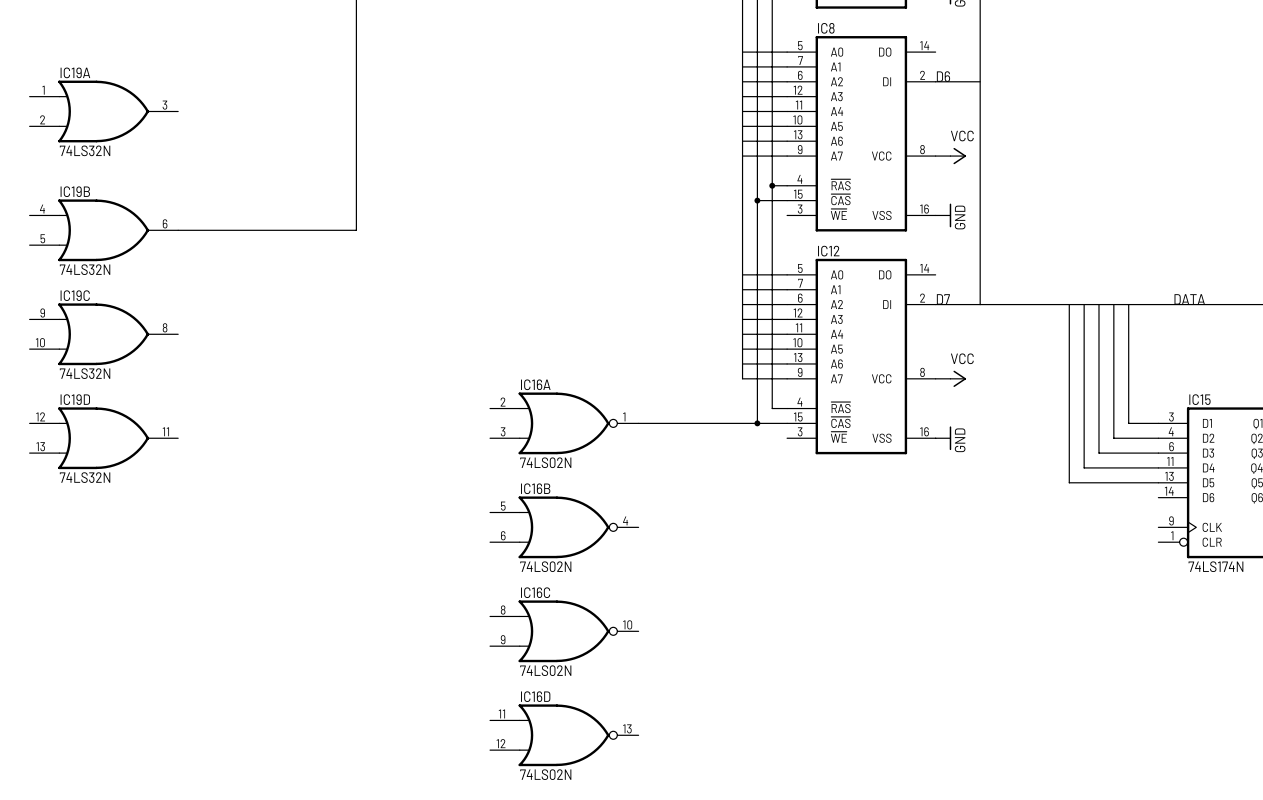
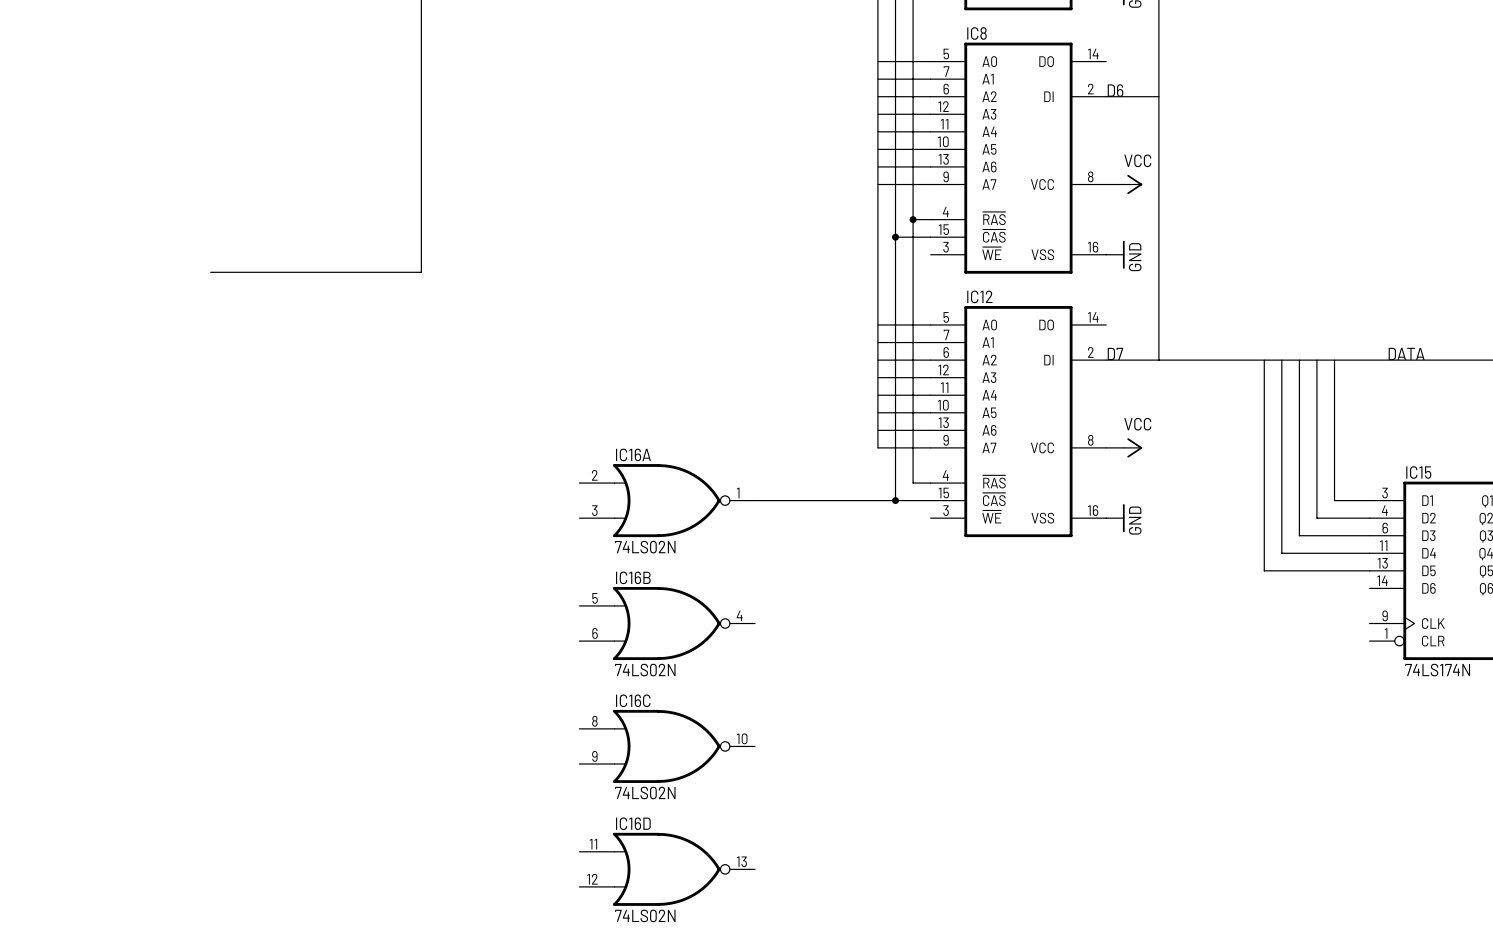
IC19A: 74LS32N (103, 111) -> none
IC19B: 74LS32N (103, 230) -> none
IC19C: 74LS32N (103, 334) -> none
IC19D: 74LS32N (103, 438) -> none

